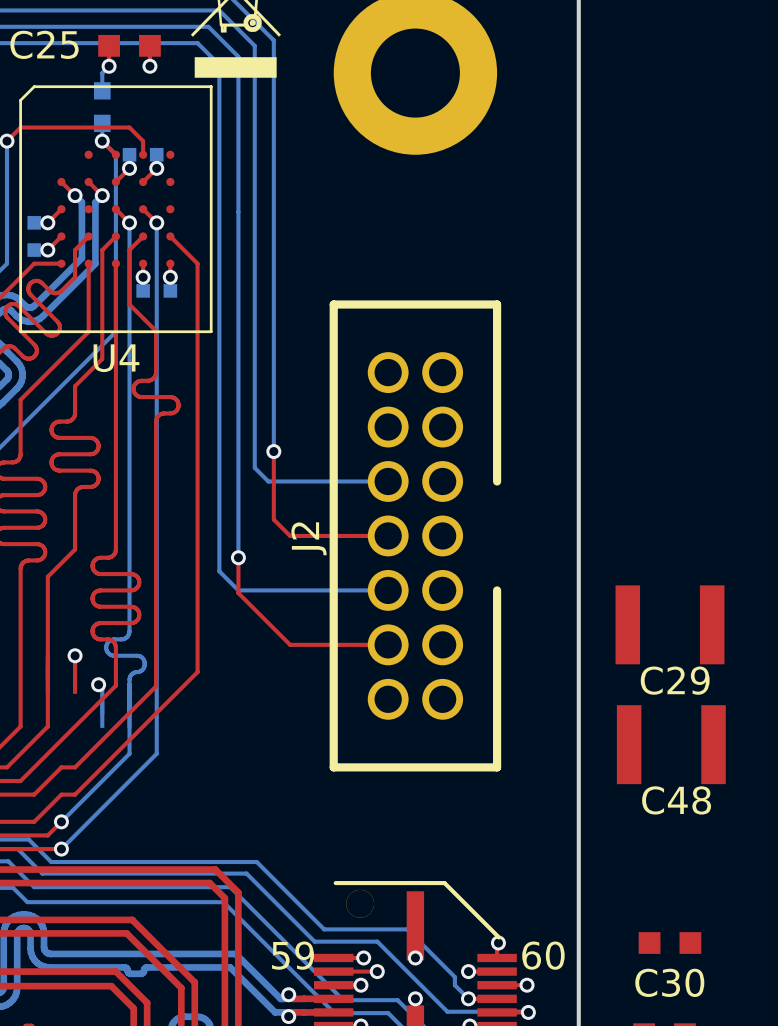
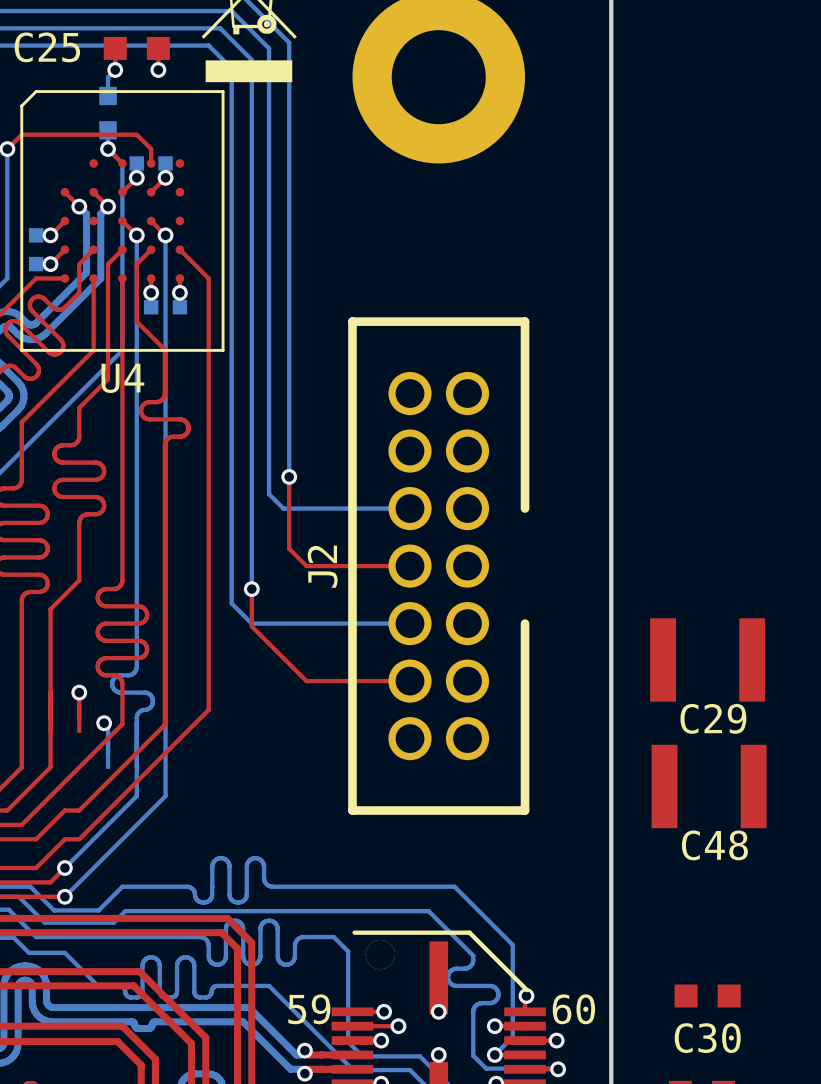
bottom track: (93, 862) (256, 862) (324, 929) (407, 929) (454, 977) (454, 985) (468, 998) -> (98, 910) (122, 886) (188, 886) (193, 889) (197, 900) (207, 901) (212, 896) (212, 864) (215, 859) (220, 858) (226, 859) (229, 864) (229, 896) (235, 902) (242, 901) (246, 897) (247, 864) (250, 859) (255, 858) (263, 862) (264, 880) (270, 886) (454, 886) (512, 944) (512, 1036) (494, 1054)
bottom track: (107, 873) (246, 873) (314, 941) (377, 941) (447, 1011) (460, 1011) -> (113, 922) (125, 911) (428, 911) (473, 955) (473, 961) (470, 966) (454, 968) (449, 971) (448, 977) (449, 982) (456, 985) (491, 986) (497, 990) (498, 996) (495, 1001) (478, 1004) (473, 1009) (473, 1055) (486, 1068)
bottom track: (189, 887) (230, 887) (329, 986) -> (200, 937) (207, 941) (209, 959) (217, 964) (222, 962) (225, 958) (226, 927) (232, 920) (238, 921) (242, 925) (243, 958) (249, 964) (255, 963) (259, 959) (260, 927) (266, 920) (273, 921) (276, 925) (277, 958) (284, 964) (290, 963) (294, 959) (295, 943) (299, 937) (333, 937) (348, 951) (348, 1042)
bottom track: (61, 902) (223, 902) (254, 933) -> (64, 952) (97, 985) (122, 986) (129, 997) (138, 997) (141, 994) (142, 963) (145, 959) (151, 957) (156, 959) (159, 963) (159, 992) (164, 997) (172, 997) (176, 994) (177, 963) (180, 959) (185, 957) (191, 959) (194, 963) (194, 992) (198, 997) (209, 996) (212, 988) (216, 986) (269, 985)

